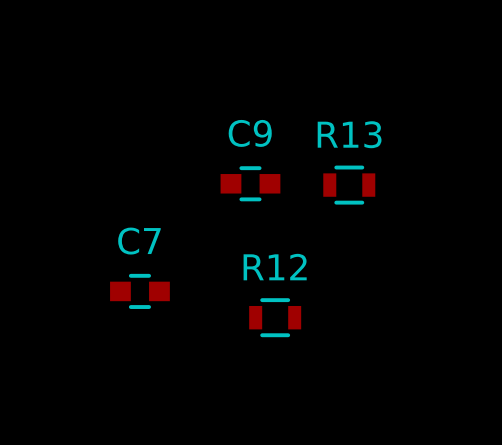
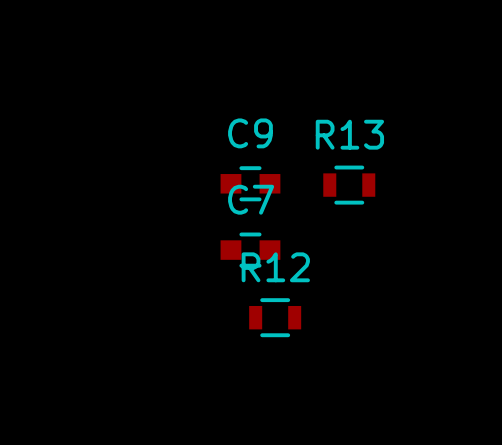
C7 position: (139, 291) -> (250, 250)

